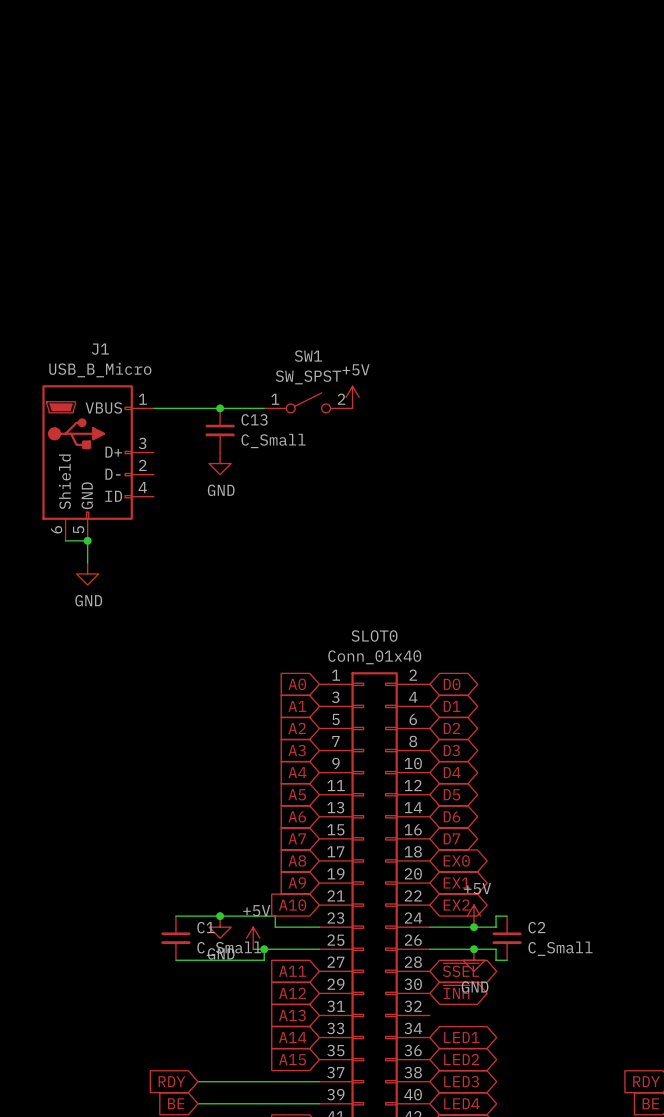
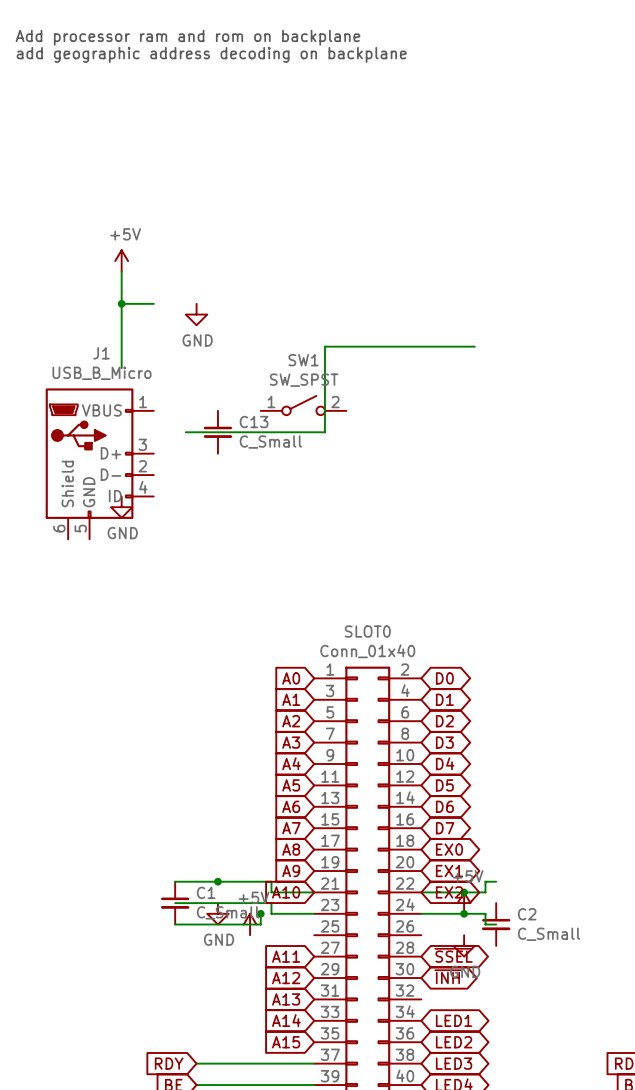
text: none -> Add processor ram and rom on backplane (187, 37)
text: none -> add geographic address decoding on backplane (211, 54)
power symbol: none -> +5V (121, 261)
wire: none -> (121, 271) (121, 368)
wire: none -> (121, 303) (153, 303)
junction: none -> (121, 303)
power symbol: none -> GND (196, 314)
wire: none -> (474, 346) (324, 346) (324, 432) (185, 432)
power symbol: +5V (352, 397) -> none
wire: (153, 408) (264, 408) -> none
junction: (220, 408) -> none
power symbol: GND (220, 463) -> none
power symbol: none -> GND (121, 507)
wire: (65, 540) (87, 540) (87, 562) -> none
junction: (87, 540) -> none
power symbol: GND (87, 573) -> none
wire: none -> (175, 881) (271, 881) (271, 892) (314, 892)
wire: none -> (496, 881) (485, 881) (485, 892) (421, 892)
junction position: (220, 916) -> (217, 881)
wire: (507, 916) (496, 916) (496, 927) -> (496, 924) (485, 924) (485, 913)
C1 position: (175, 938) -> (175, 903)
wire: (253, 949) (319, 949) -> none
wire: (264, 949) (264, 960) (175, 960) -> (260, 913) (260, 924) (175, 924)
junction position: (264, 949) -> (260, 913)
wire: (429, 949) (496, 949) (496, 960) (507, 960) -> none
junction position: (473, 949) -> (464, 892)

